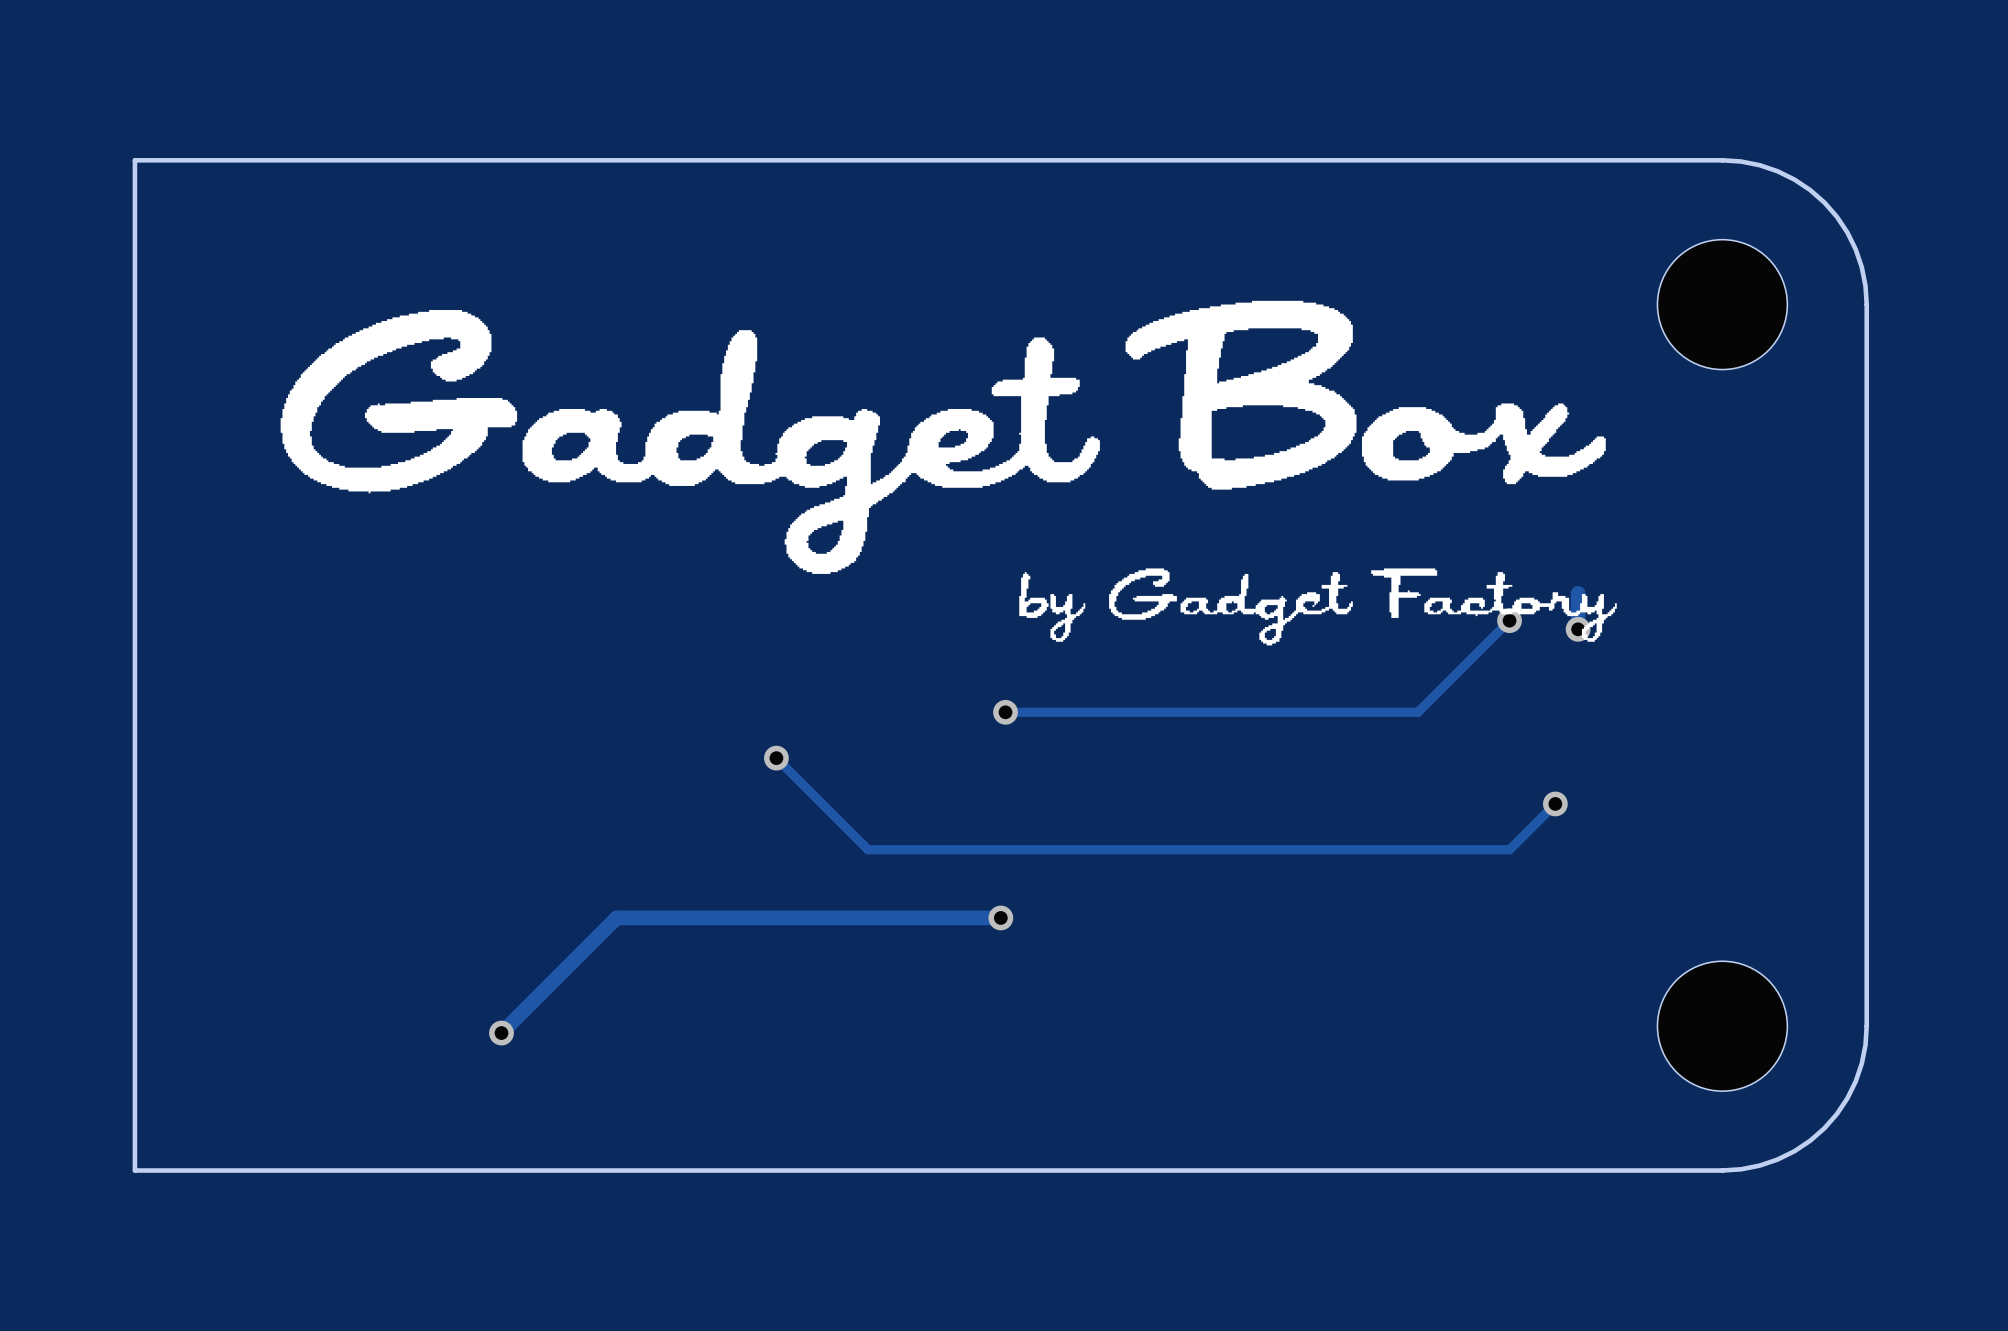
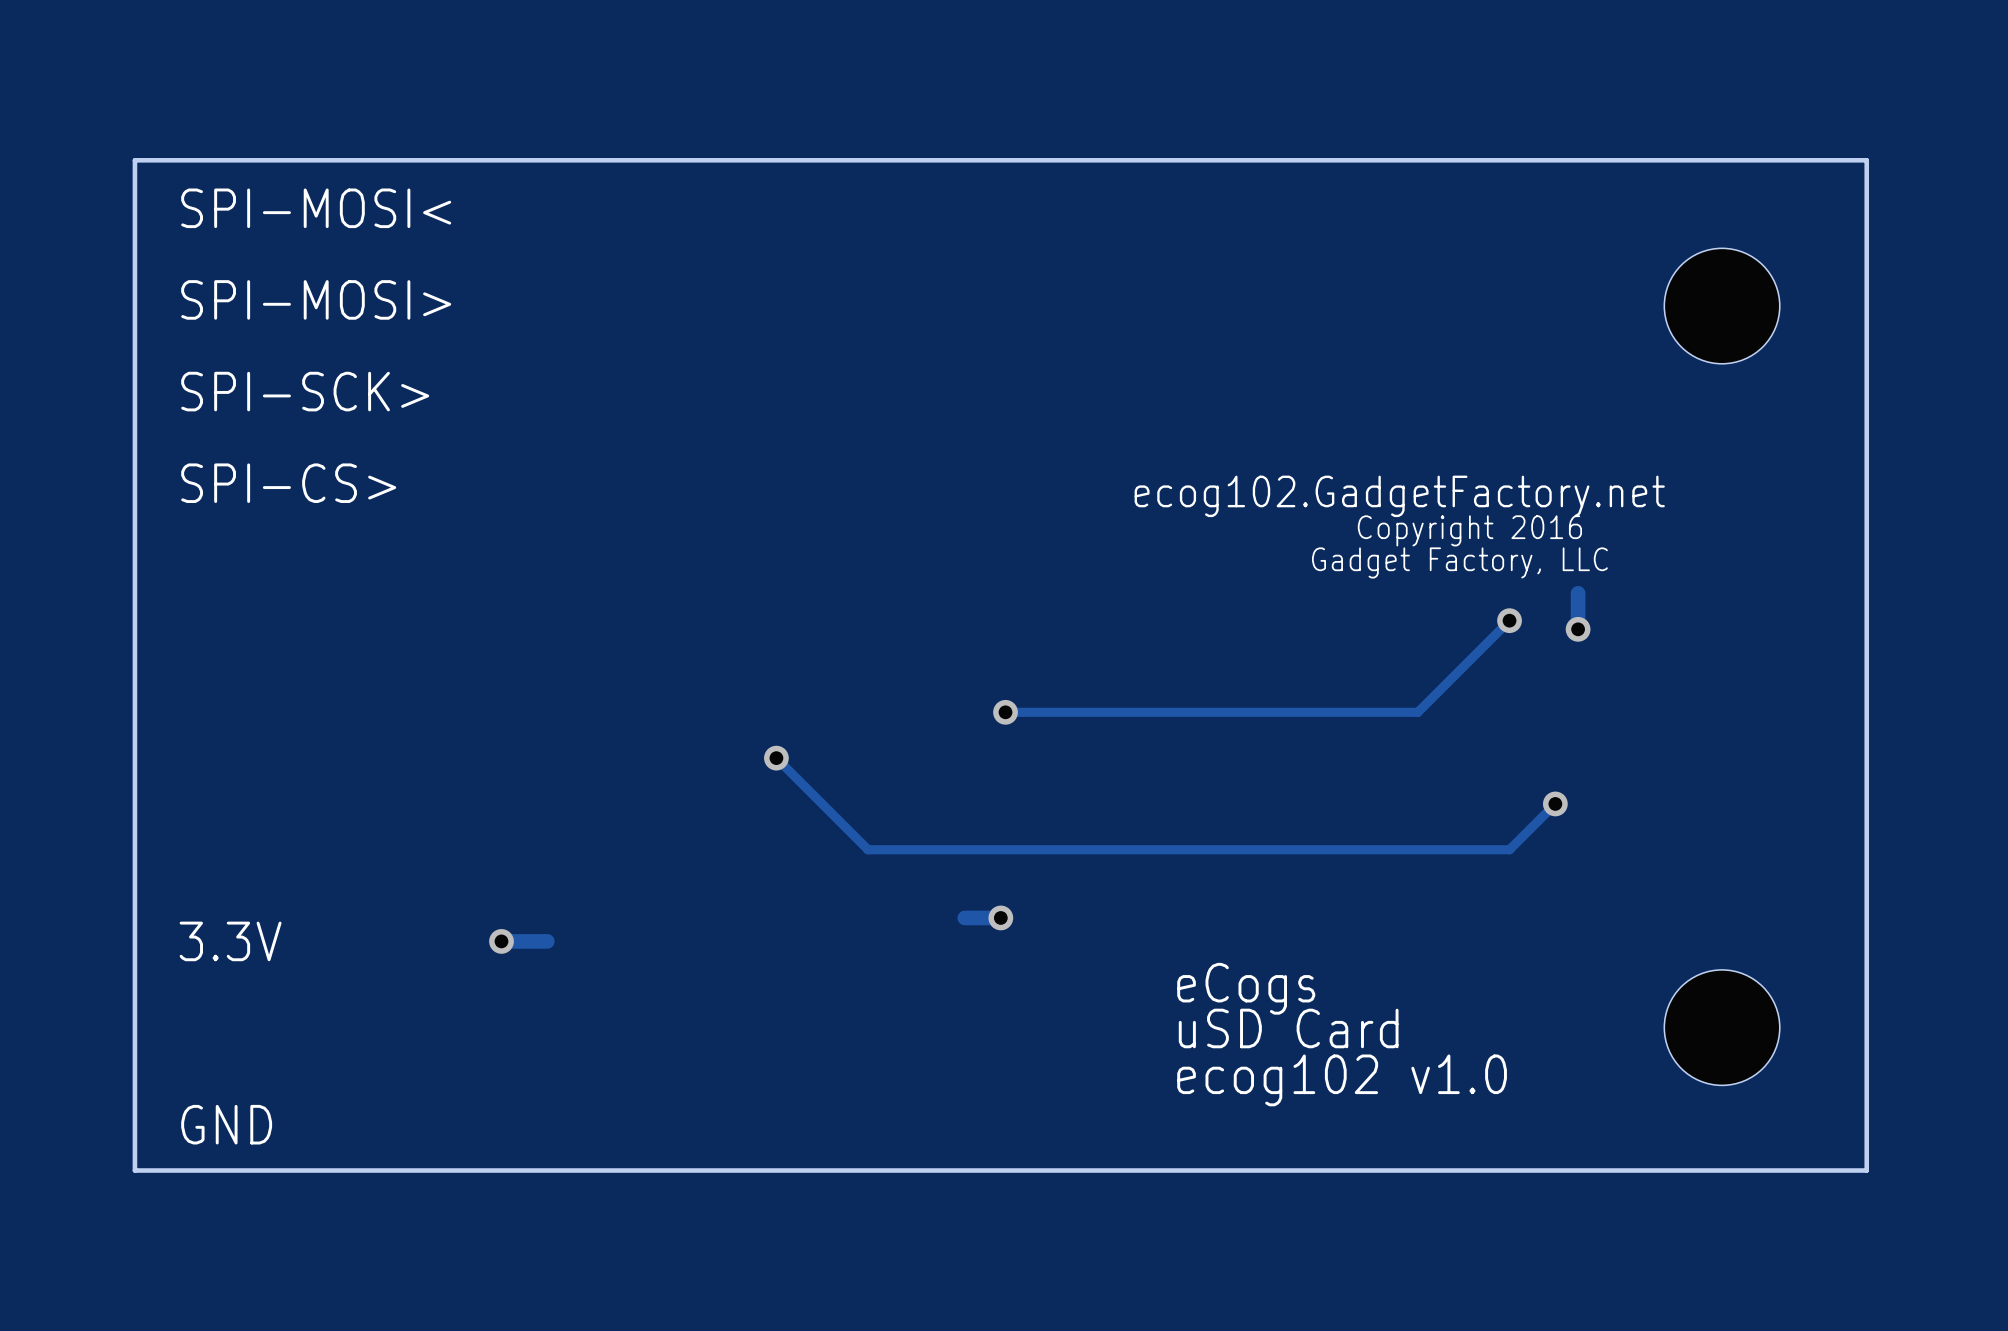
part footprint: [132, 158, 1870, 1173] -> [132, 158, 1870, 1173]
text: none -> SPI-MOSI< (316, 208)
text: none -> SPI-MOSI> (316, 299)
drawing: [280, 300, 1617, 646] -> none
text: none -> SPI-SCK> (305, 391)
text: none -> SPI-CS> (288, 483)
text: none -> ecog102.GadgetFactory.net (1399, 496)
text: none -> Copyright 2016 (1469, 530)
text: none -> Gadget Factory, LLC (1459, 562)
track: (964, 917) (616, 917) (501, 1033) -> none
text: none -> 3.3V (230, 941)
track: none -> (501, 941) (547, 941)
text: none -> eCogs (1246, 988)
text: none -> uSD Card (1288, 1028)
via position: (501, 1033) -> (501, 941)
text: none -> ecog102 v1.0 (1342, 1080)
text: none -> GND (226, 1124)

